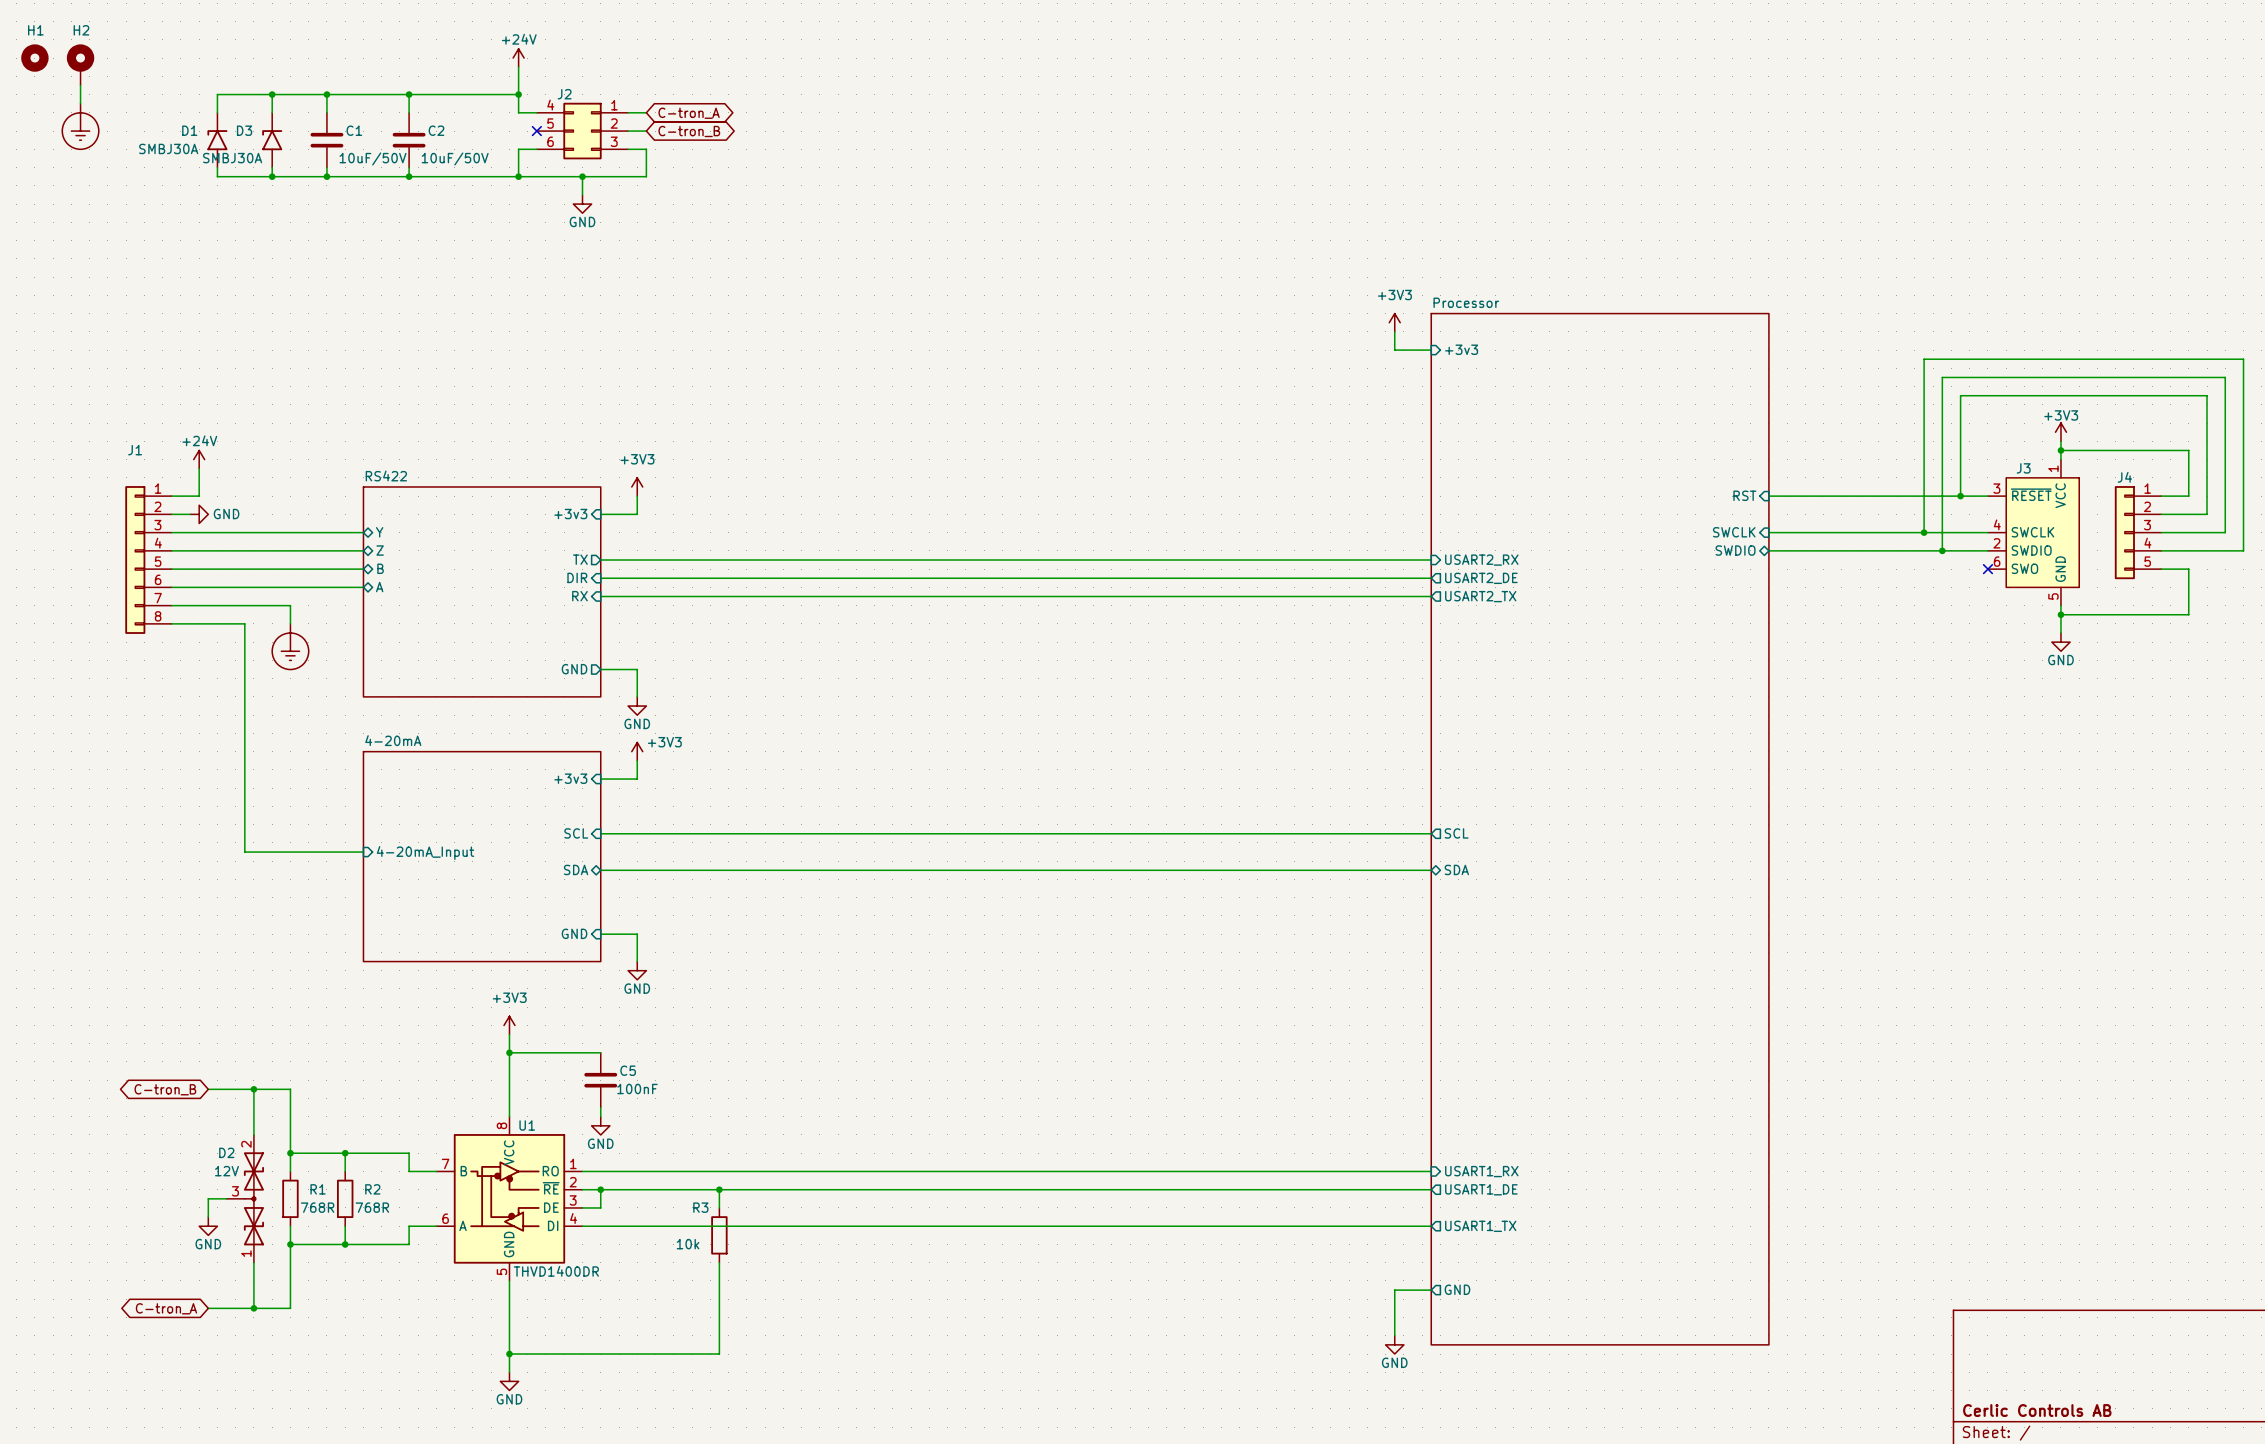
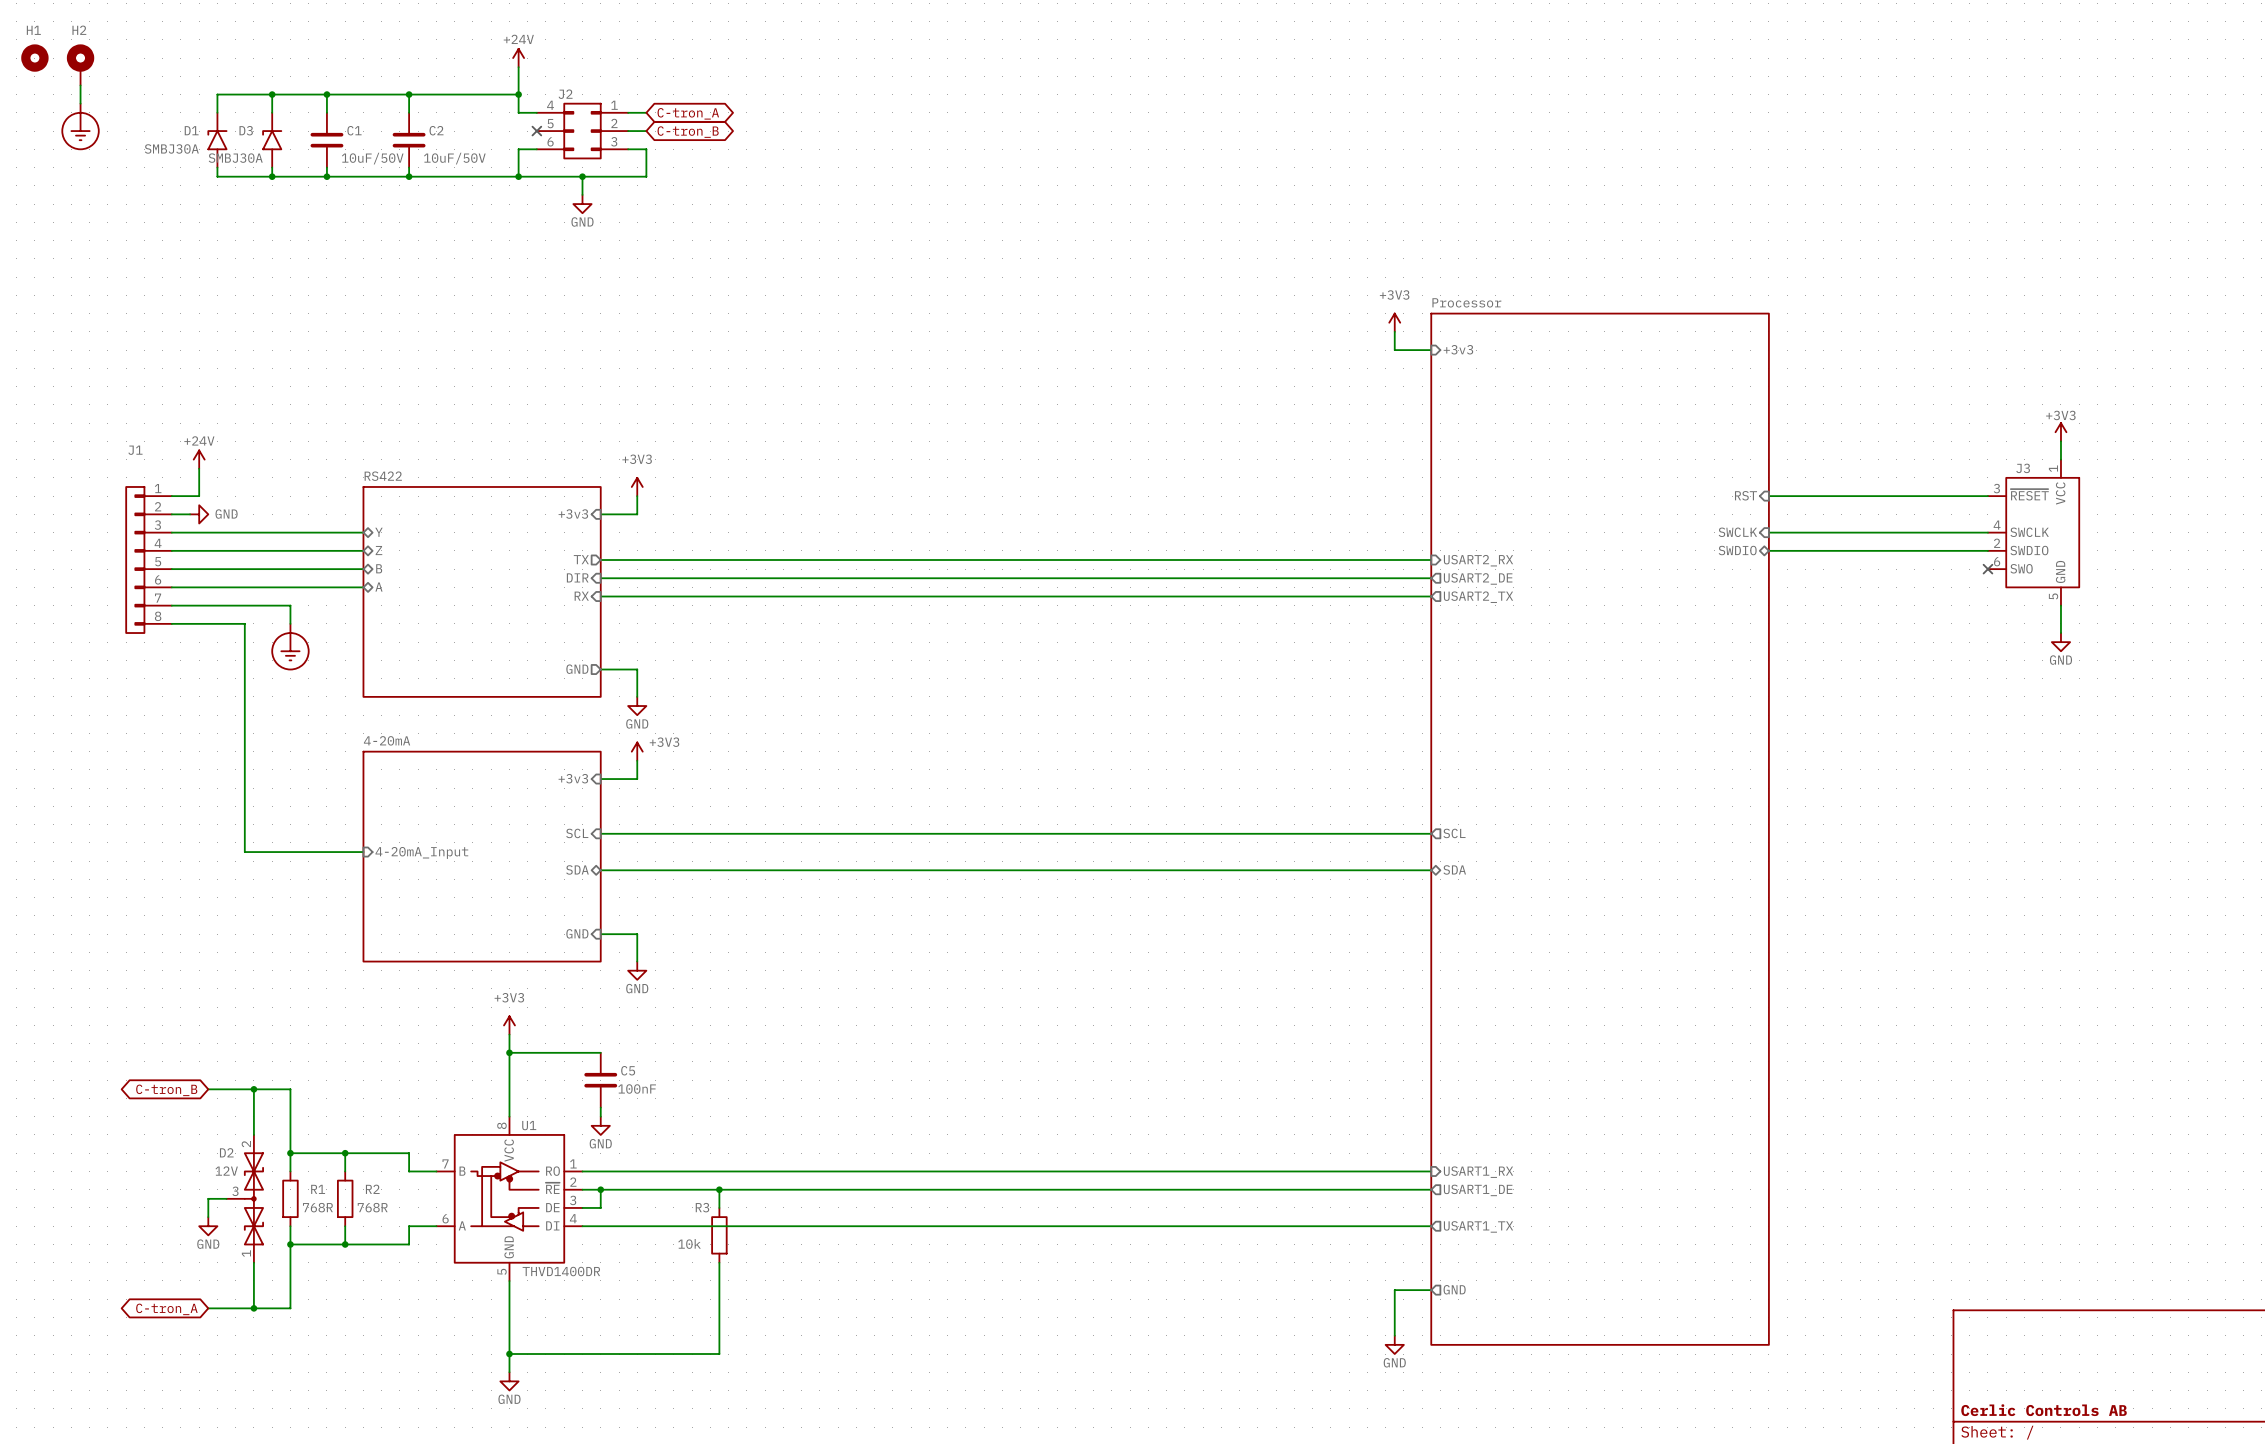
wire: (2060, 450) (2188, 450) (2188, 496) (2161, 496) -> none
junction: (2060, 450) -> none
wire: (1960, 496) (1960, 395) (2207, 395) (2207, 514) (2161, 514) -> none
junction: (1960, 496) -> none
wire: (1924, 532) (1924, 359) (2243, 359) (2243, 550) (2161, 550) -> none
junction: (1924, 532) -> none
J4: (2138, 532) -> none
wire: (2161, 532) (2225, 532) (2225, 377) (1942, 377) (1942, 550) -> none
junction: (1942, 550) -> none
wire: (2161, 569) (2188, 569) (2188, 614) (2060, 614) -> none
junction: (2060, 614) -> none

